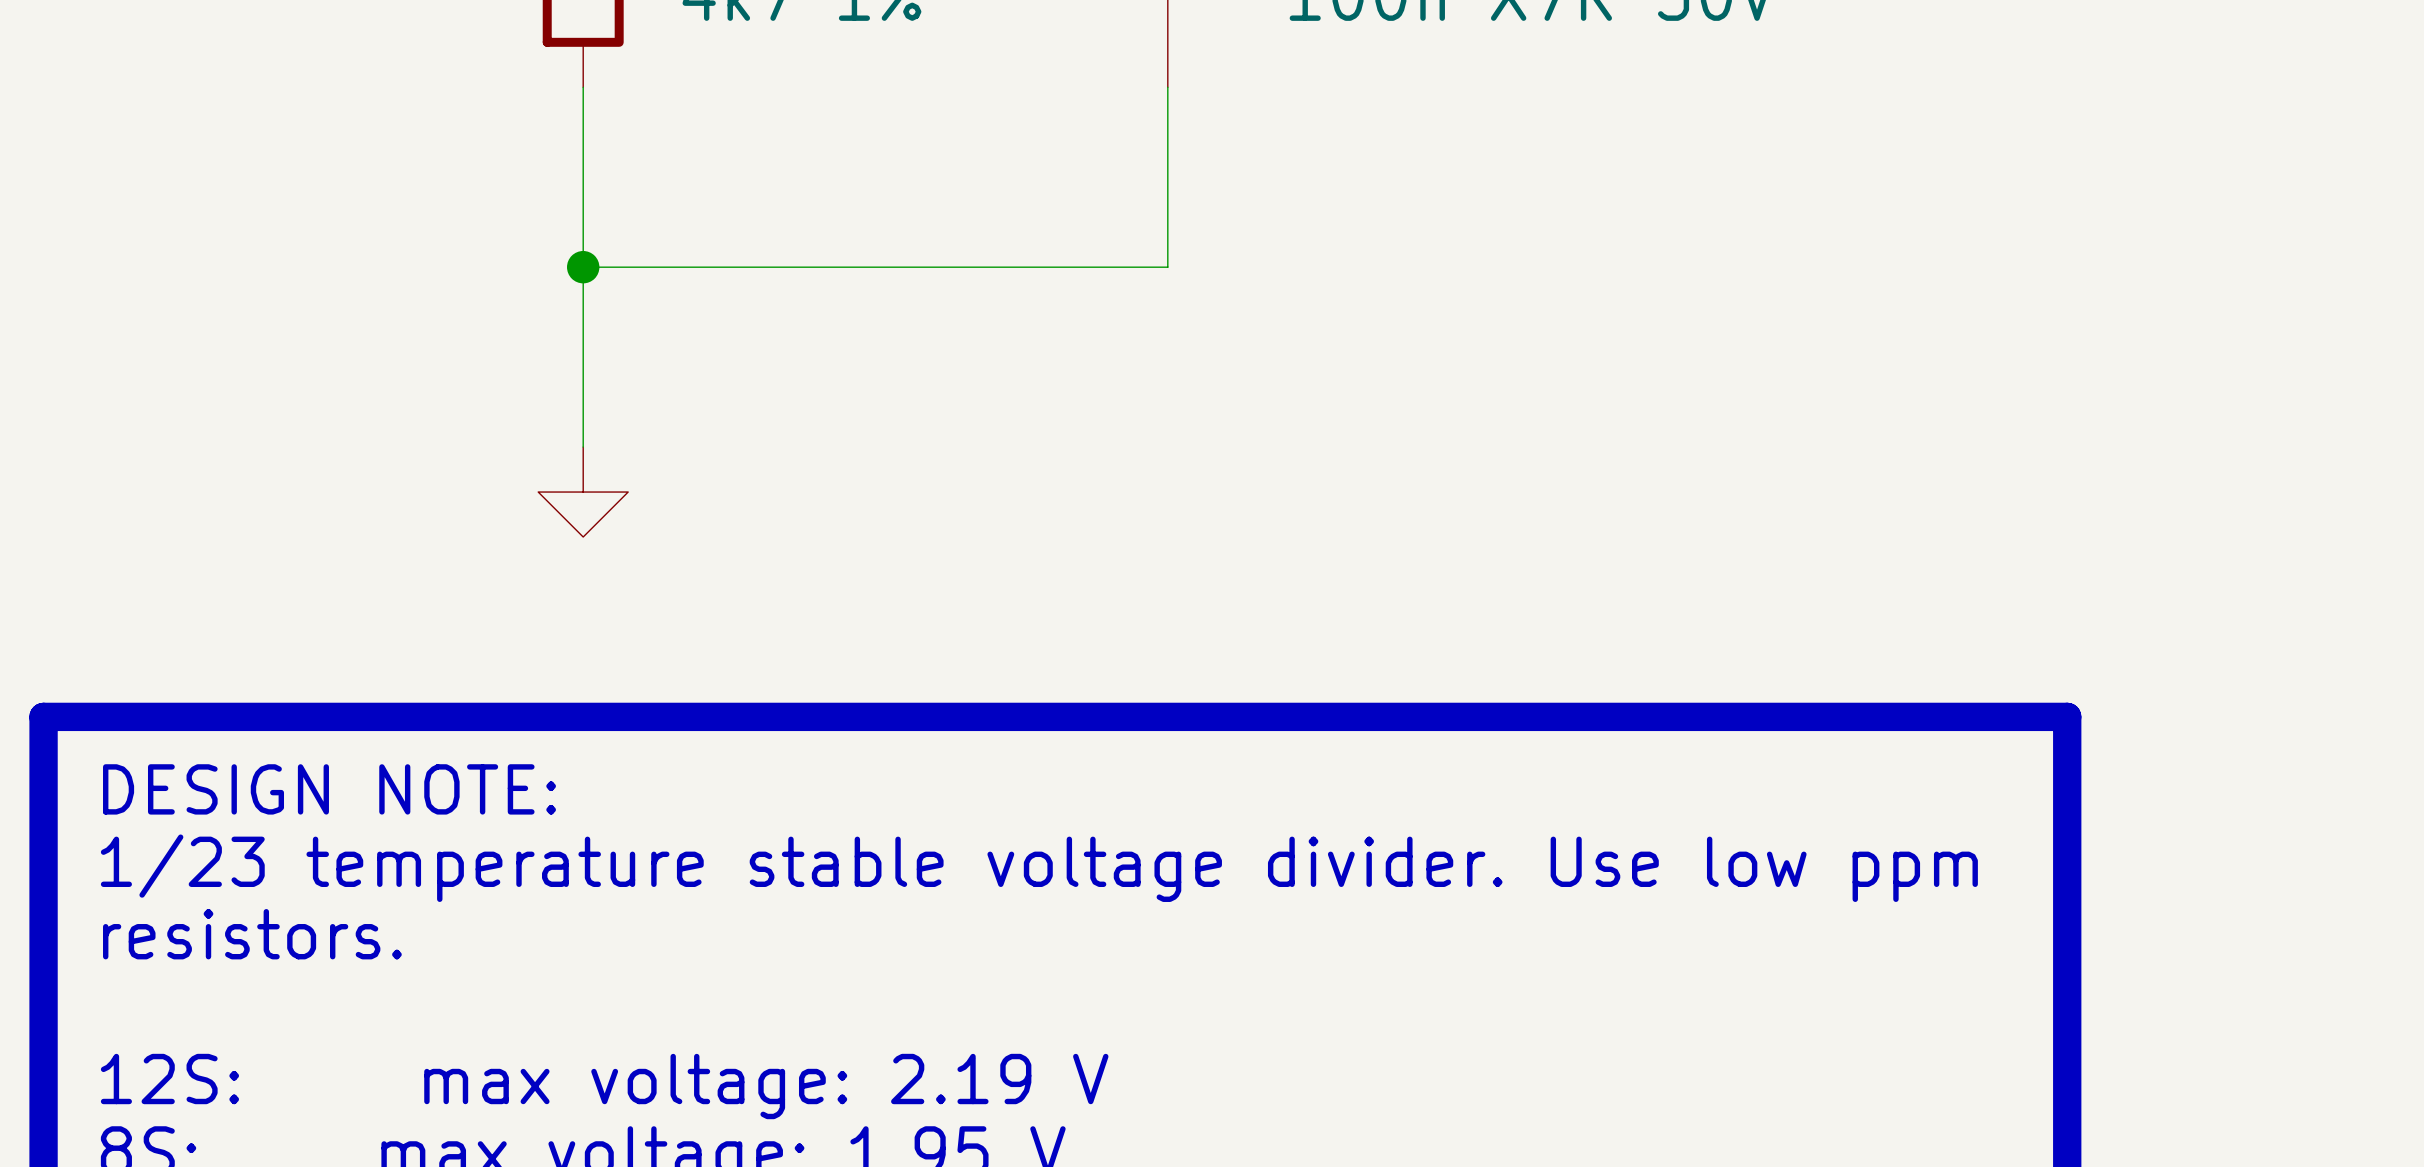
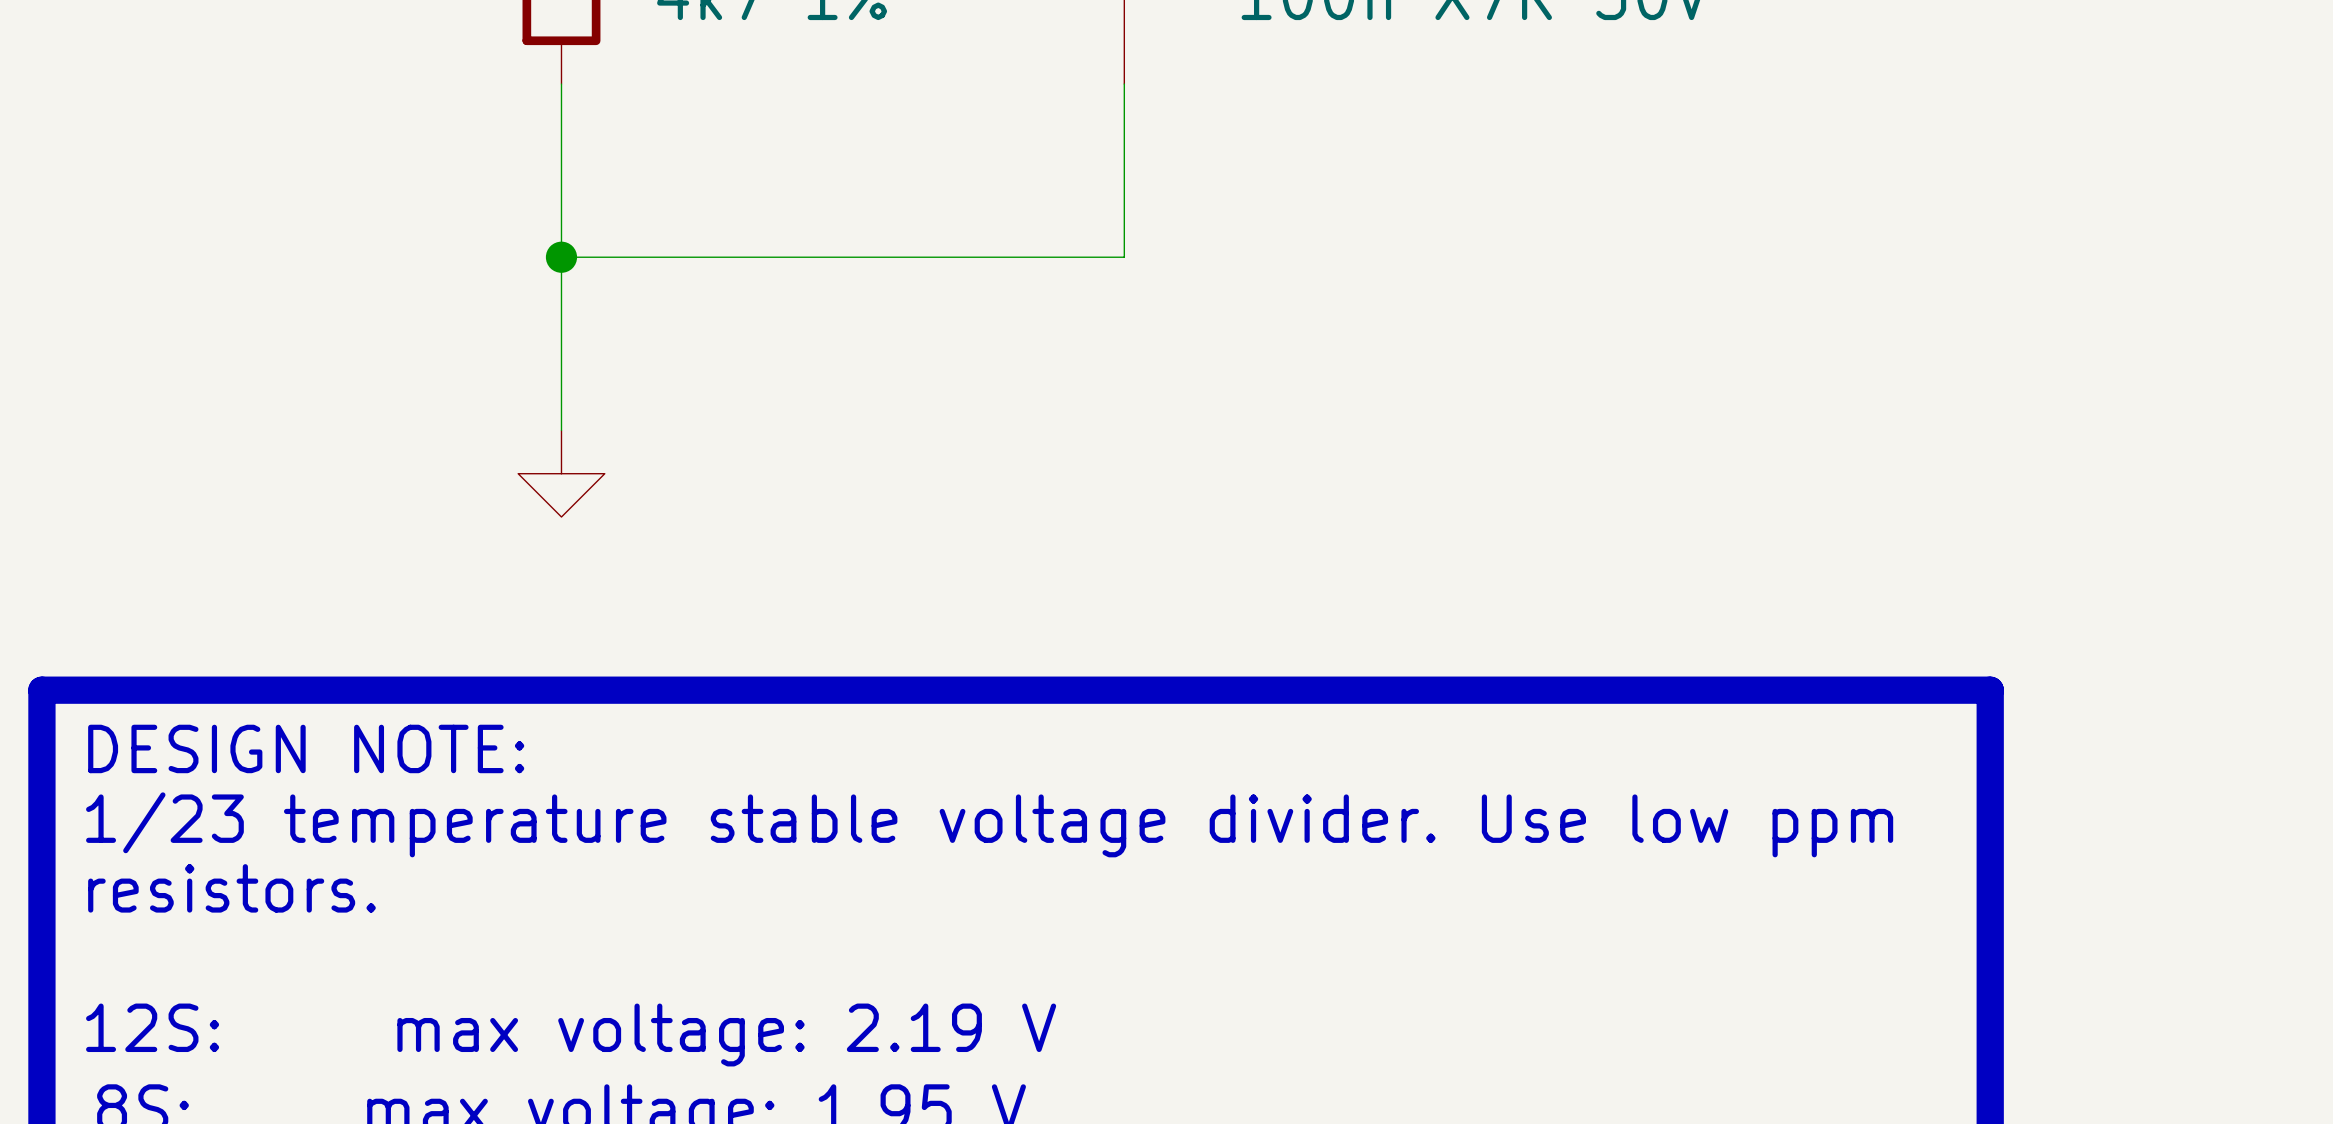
text position: DESIGN NOTE: (329, 789) -> DESIGN NOTE: (306, 748)
text position: 1/23 temperature stable voltage divider. Use low ppm (1039, 868) -> 1/23 temperature stable voltage divider. Use low ppm (989, 824)
text position: resistors. (252, 934) -> resistors. (231, 888)
text position: 12S: max voltage: 2.19 V (604, 1086) -> 12S: max voltage: 2.19 V (571, 1035)

